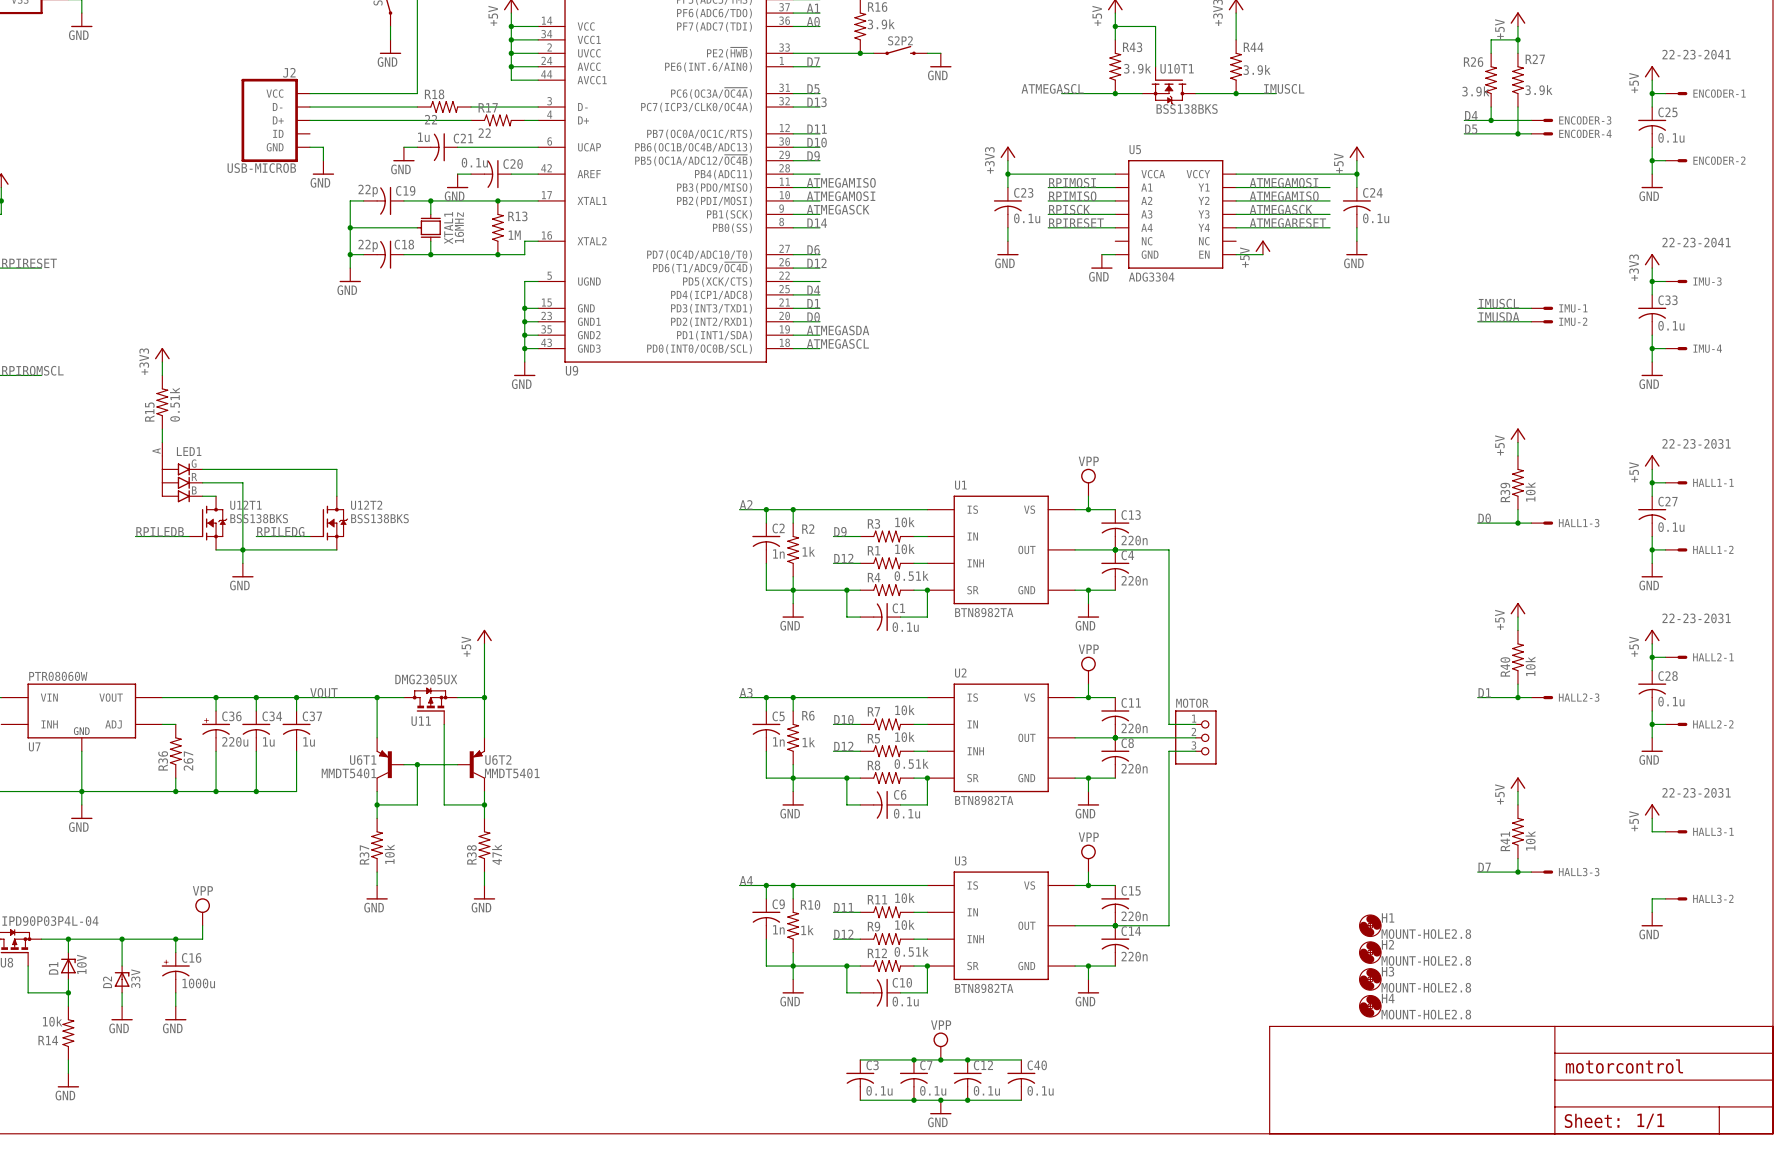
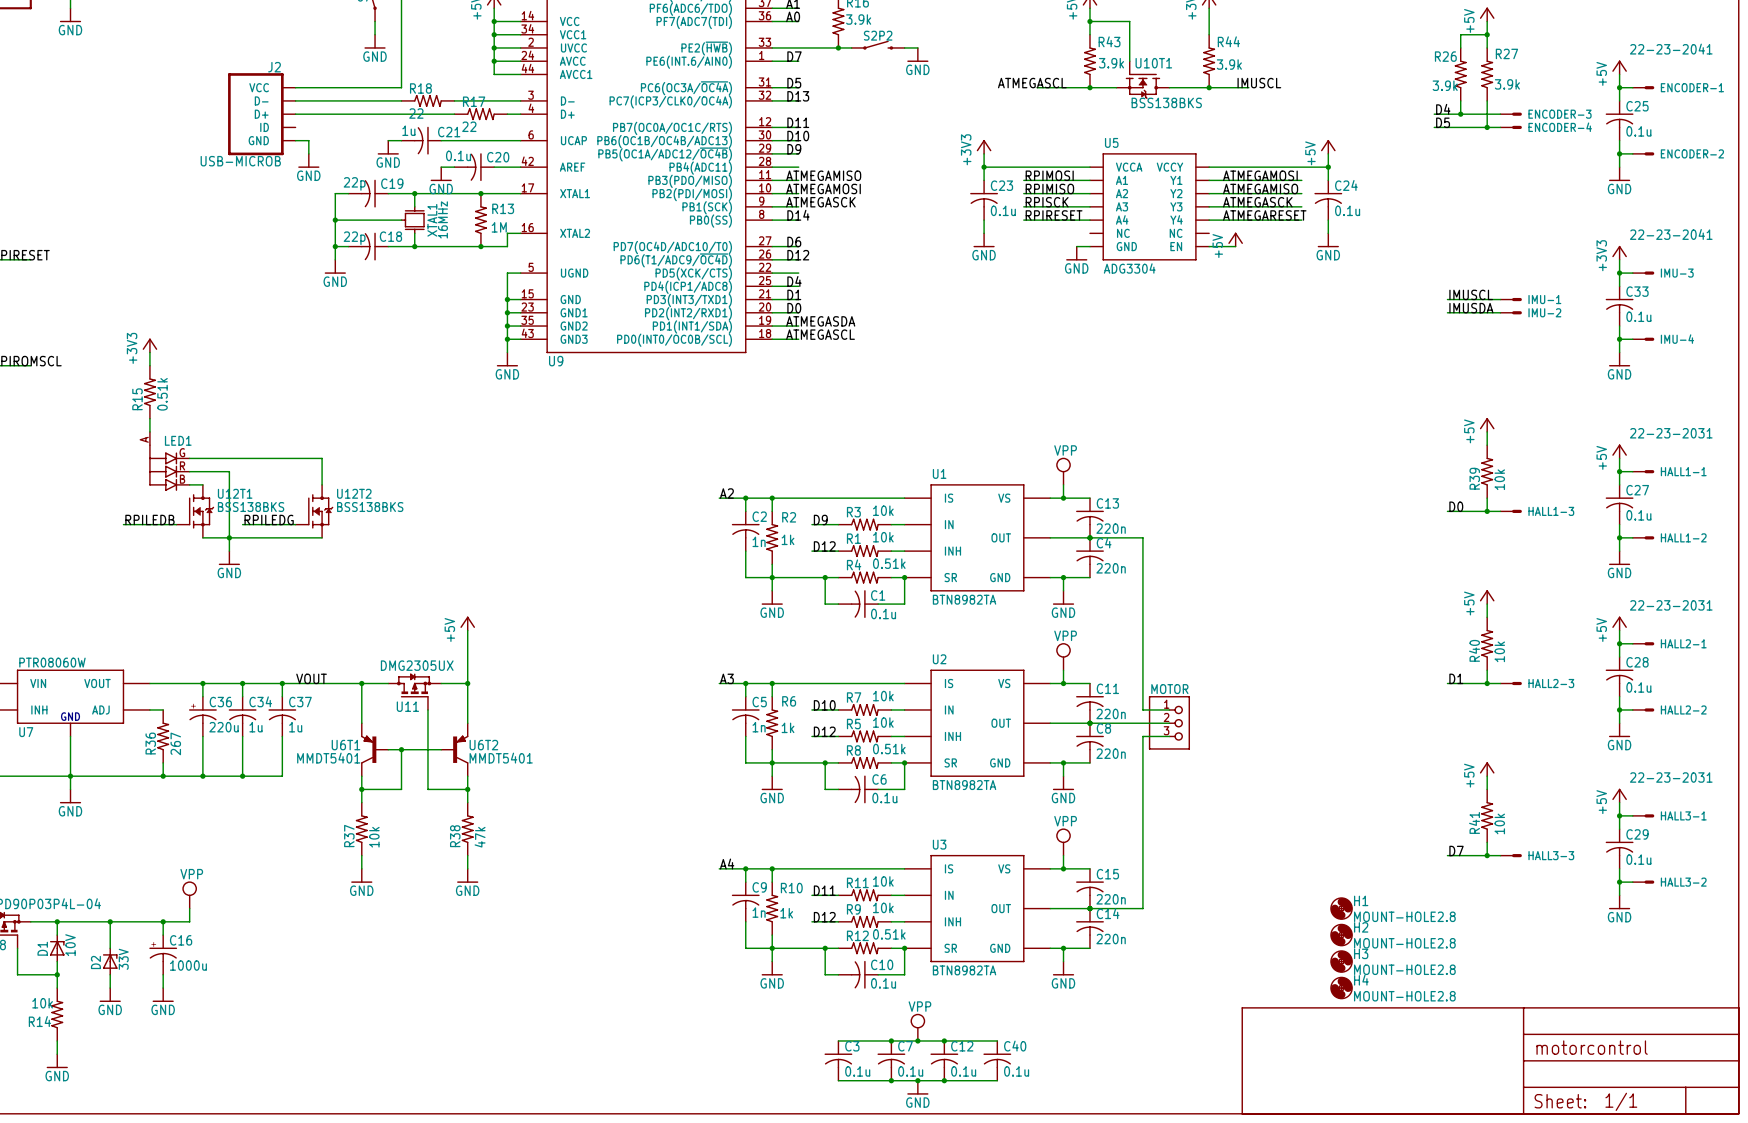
wire: none -> (1619, 815) (1619, 829)
junction: none -> (1619, 815)
C29: none -> 0.1u (1619, 849)
wire: none -> (1619, 868) (1619, 882)
junction: none -> (1619, 882)

